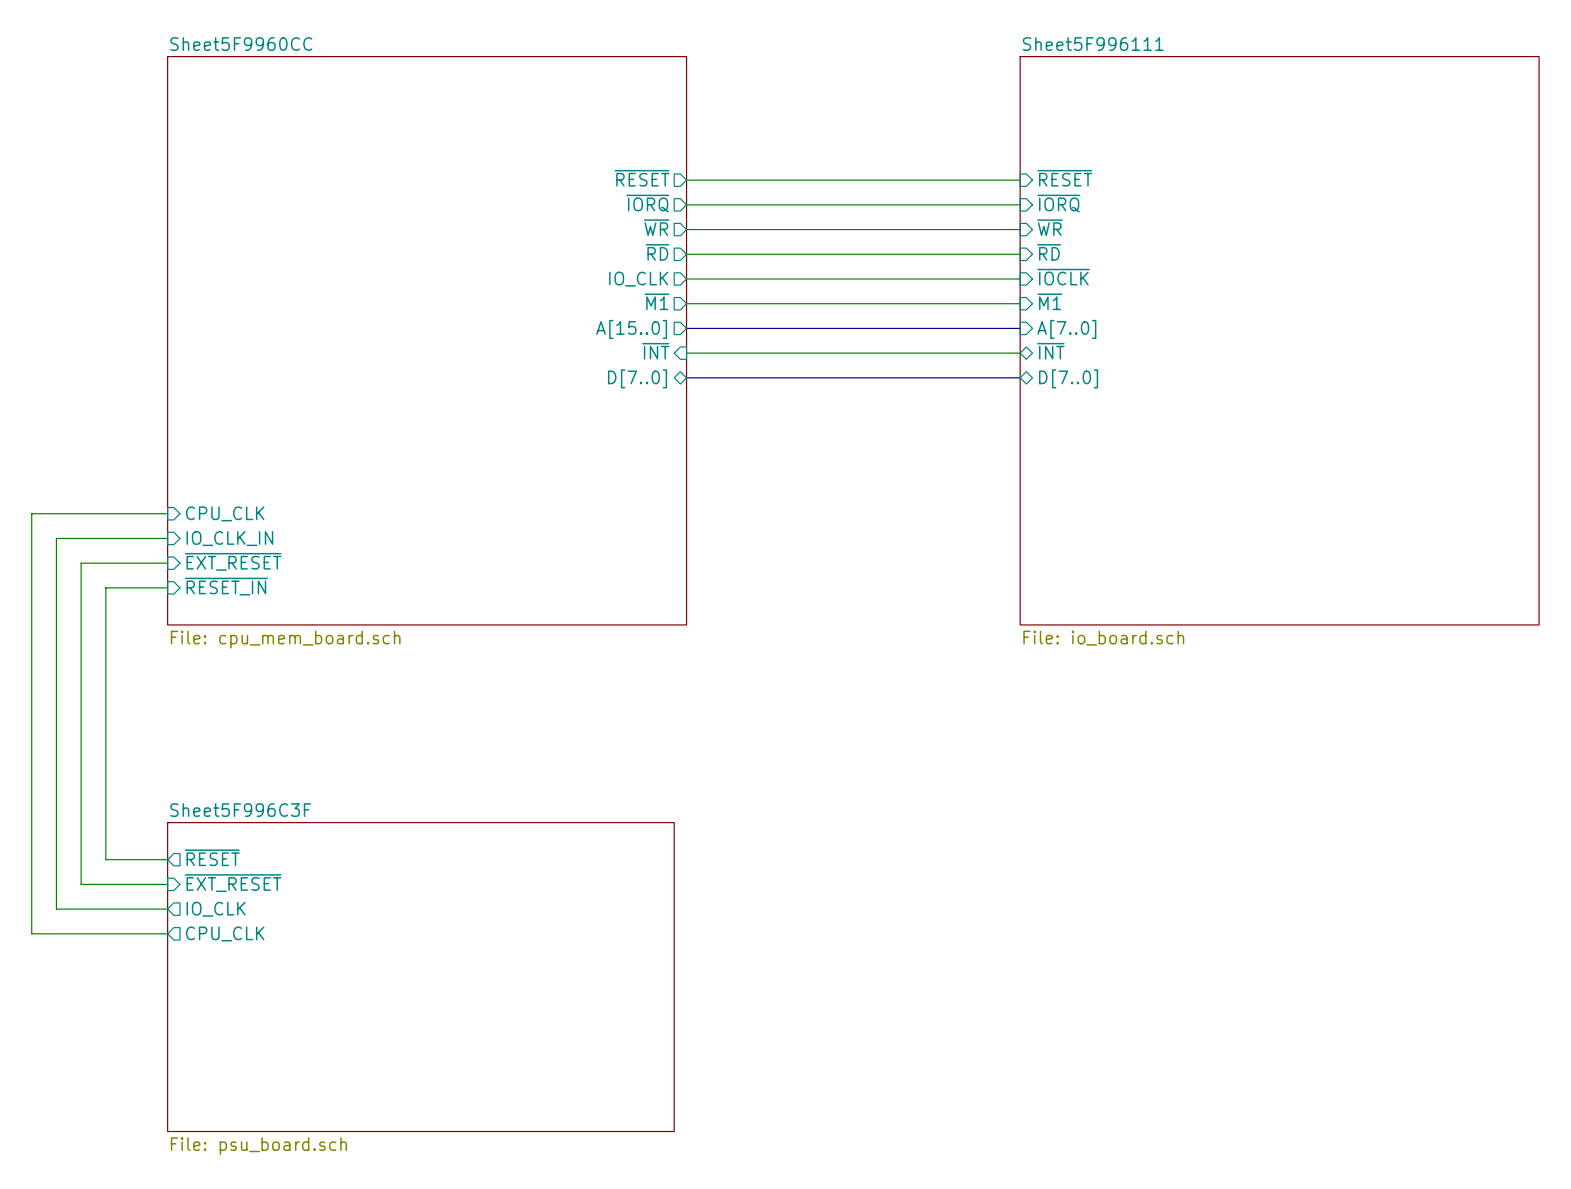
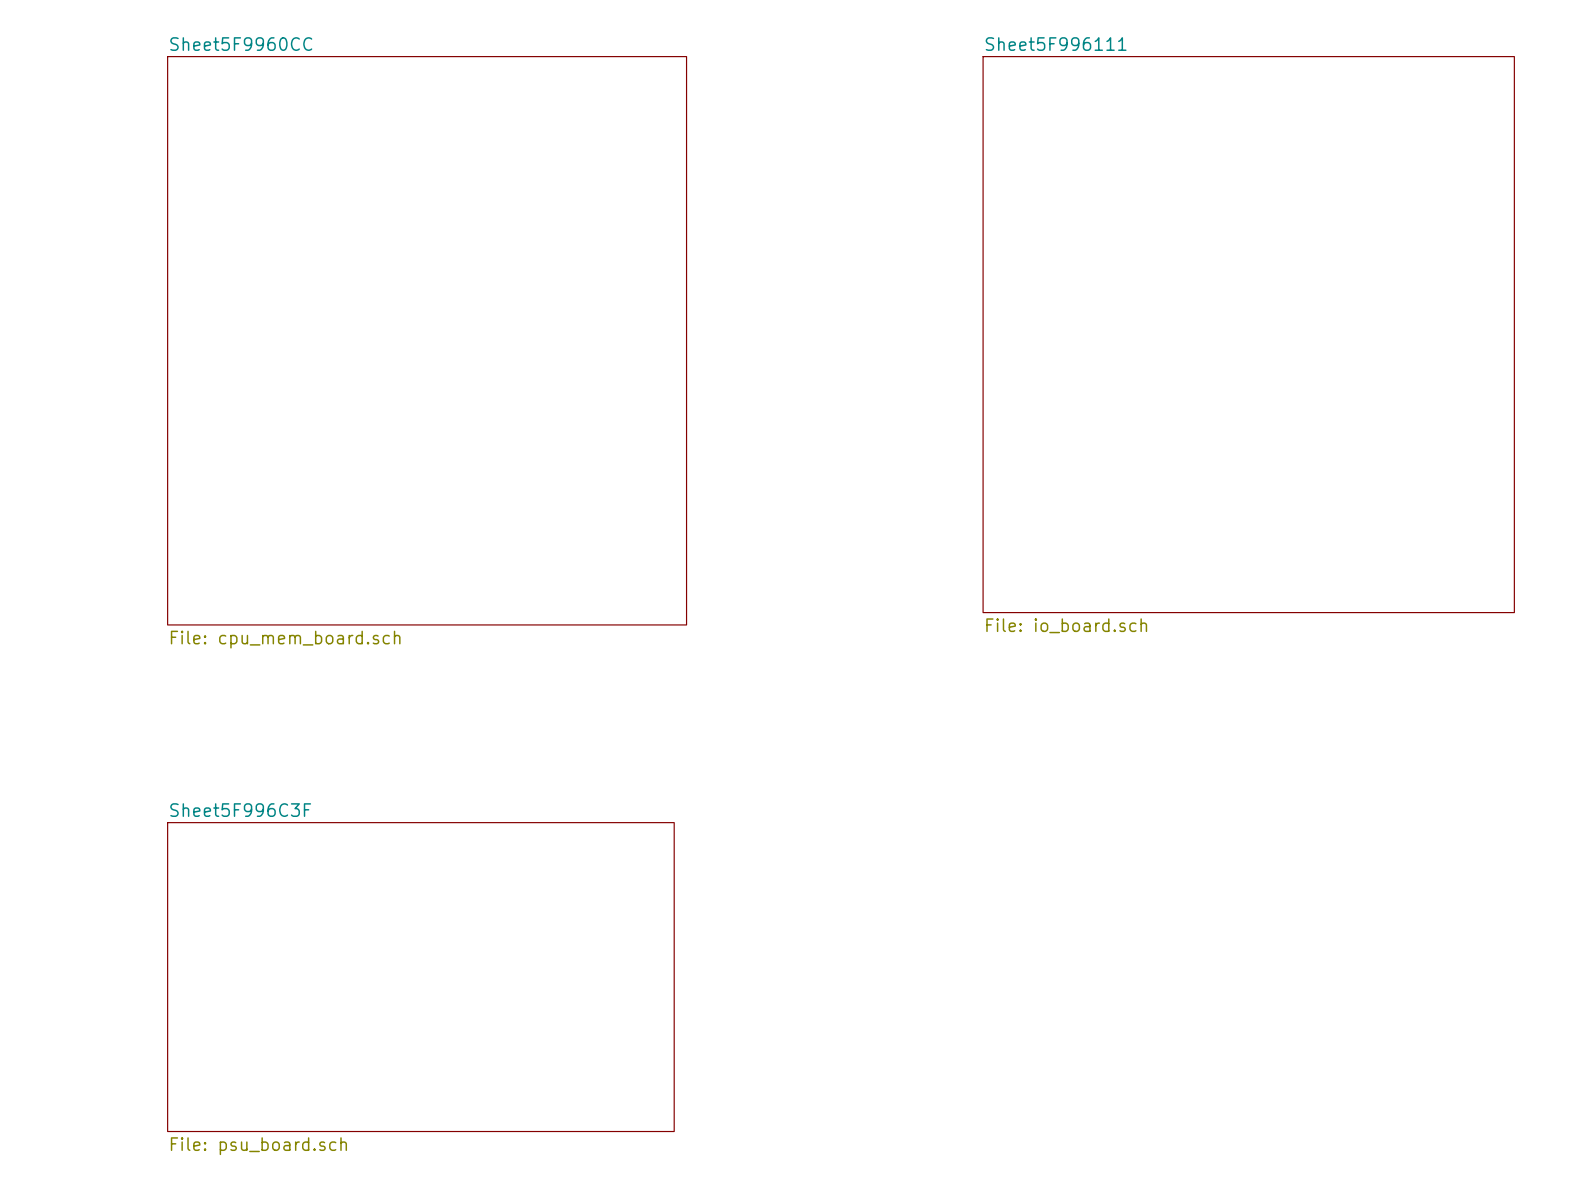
sheet Sheet5F996111 shape: [1020, 56, 1540, 625] -> [983, 56, 1515, 613]
sheet pin: ~{RESET} (641, 178) -> none
sheet pin: ~{RESET} (1064, 178) -> none
wire: (686, 180) (1020, 180) -> none
sheet pin: ~{IORQ} (647, 203) -> none
sheet pin: ~{IORQ} (1058, 203) -> none
wire: (686, 204) (1020, 204) -> none
sheet pin: ~{WR} (656, 227) -> none
sheet pin: ~{WR} (1050, 227) -> none
wire: (686, 229) (1020, 229) -> none
sheet pin: ~{RD} (657, 252) -> none
sheet pin: ~{RD} (1049, 252) -> none
wire: (686, 254) (1020, 254) -> none
sheet pin: ~{IOCLK} (1063, 277) -> none
wire: (686, 278) (1020, 278) -> none
sheet pin: IO_CLK (638, 279) -> none
sheet pin: ~{M1} (656, 301) -> none
sheet pin: ~{M1} (1049, 301) -> none
wire: (686, 303) (1020, 303) -> none
bus: (686, 328) (1020, 328) -> none
sheet pin: A[15..0] (631, 329) -> none
sheet pin: A[7..0] (1066, 329) -> none
sheet pin: ~{INT} (655, 351) -> none
sheet pin: ~{INT} (1050, 351) -> none
wire: (686, 353) (1020, 353) -> none
bus: (686, 377) (1020, 377) -> none
sheet pin: D[7..0] (637, 378) -> none
sheet pin: D[7..0] (1068, 378) -> none
wire: (167, 513) (31, 513) (31, 933) (167, 933) -> none
sheet pin: CPU_CLK (225, 513) -> none
wire: (167, 538) (56, 538) (56, 909) (167, 909) -> none
sheet pin: IO_CLK_IN (229, 538) -> none
sheet pin: ~{EXT_RESET} (233, 561) -> none
wire: (167, 563) (81, 563) (81, 884) (167, 884) -> none
sheet pin: ~{RESET_IN} (226, 586) -> none
wire: (167, 587) (105, 587) (105, 859) (167, 859) -> none
sheet pin: ~{RESET} (212, 857) -> none
sheet pin: ~{EXT_RESET} (233, 883) -> none
sheet pin: IO_CLK (216, 909) -> none
sheet pin: CPU_CLK (225, 933) -> none

